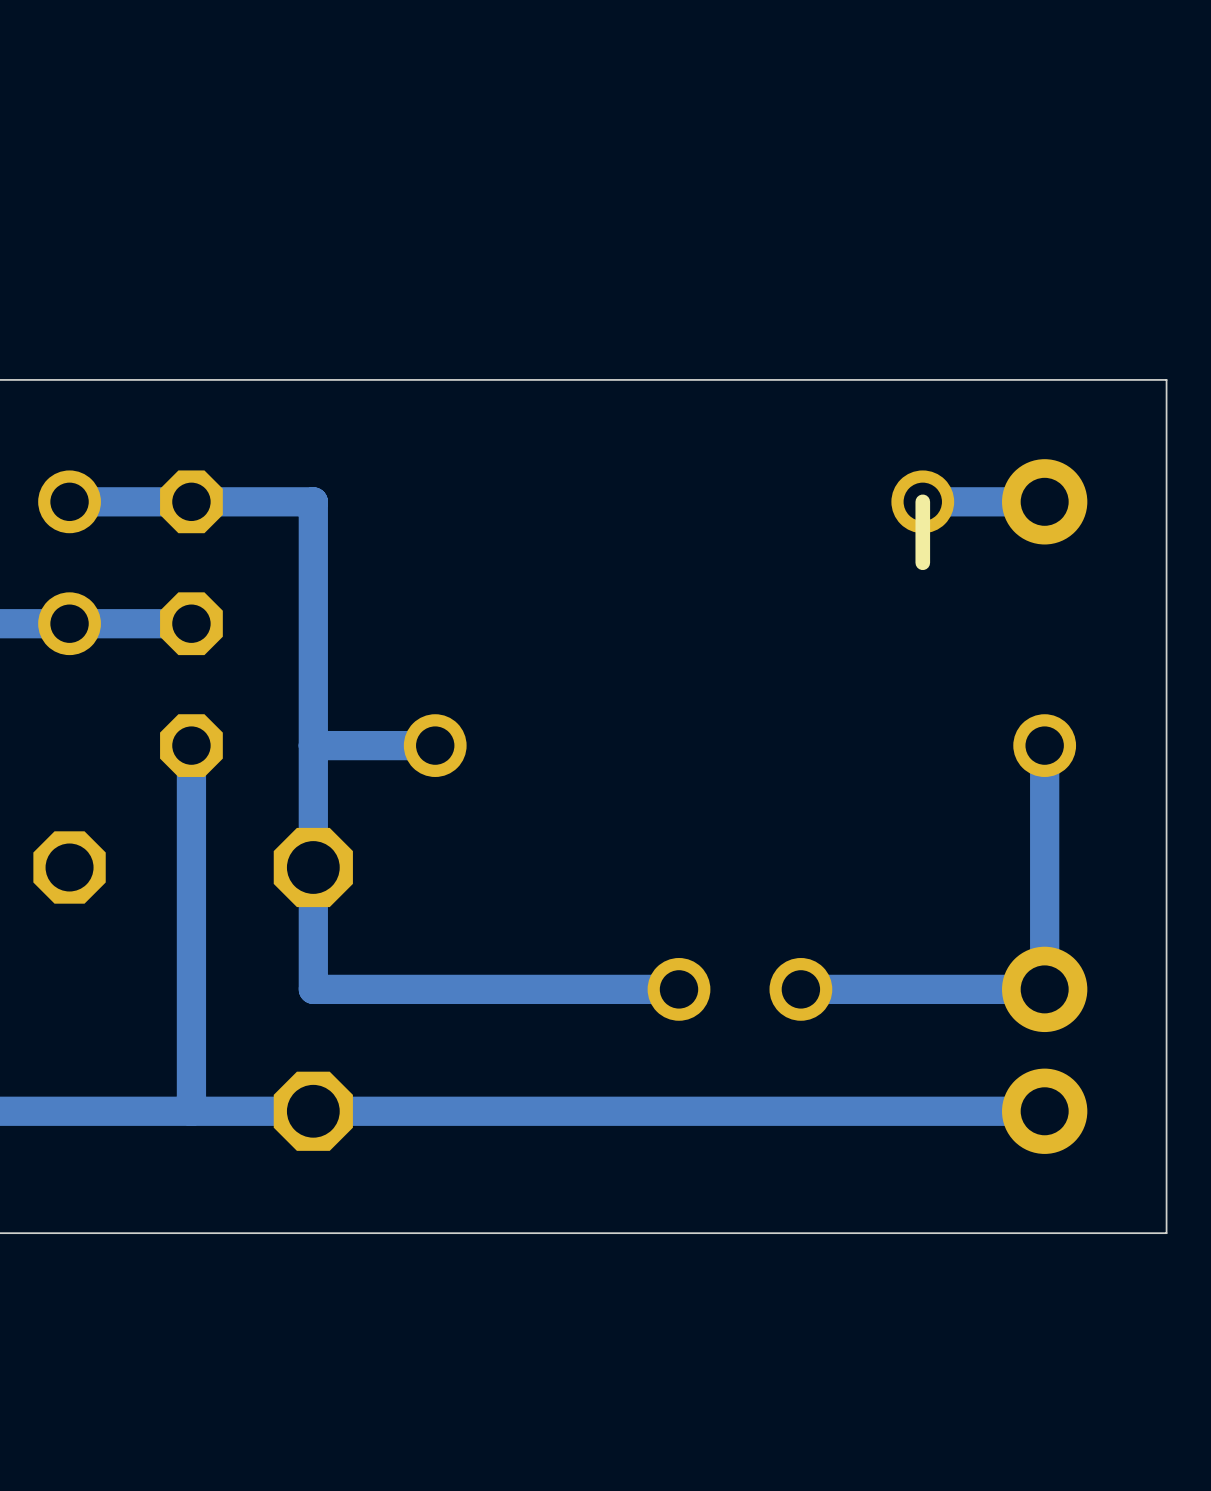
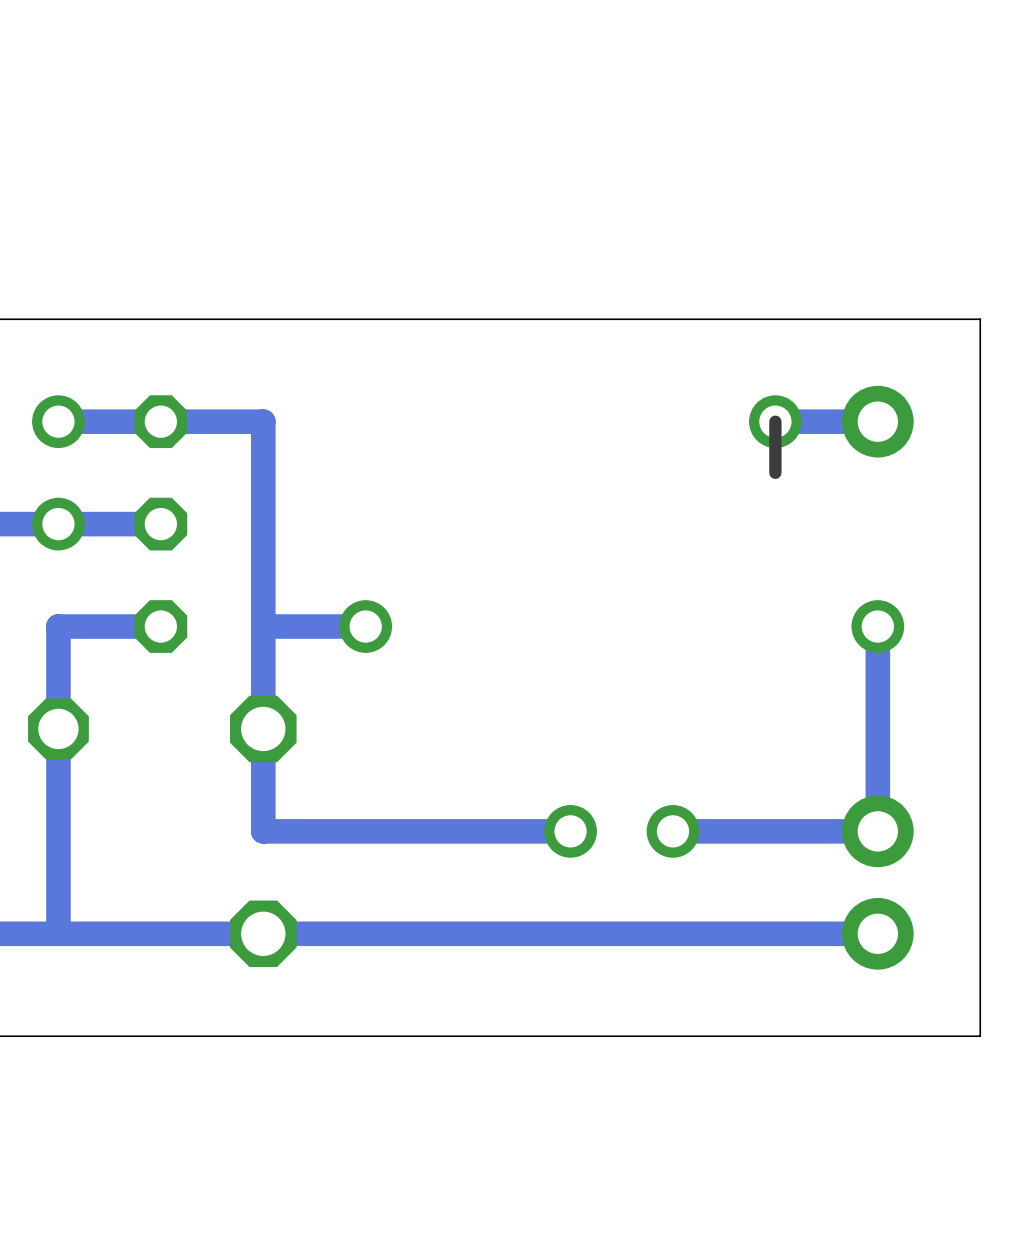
bottom track: (191, 745) (191, 1111) -> (160, 626) (58, 626) (58, 933)

